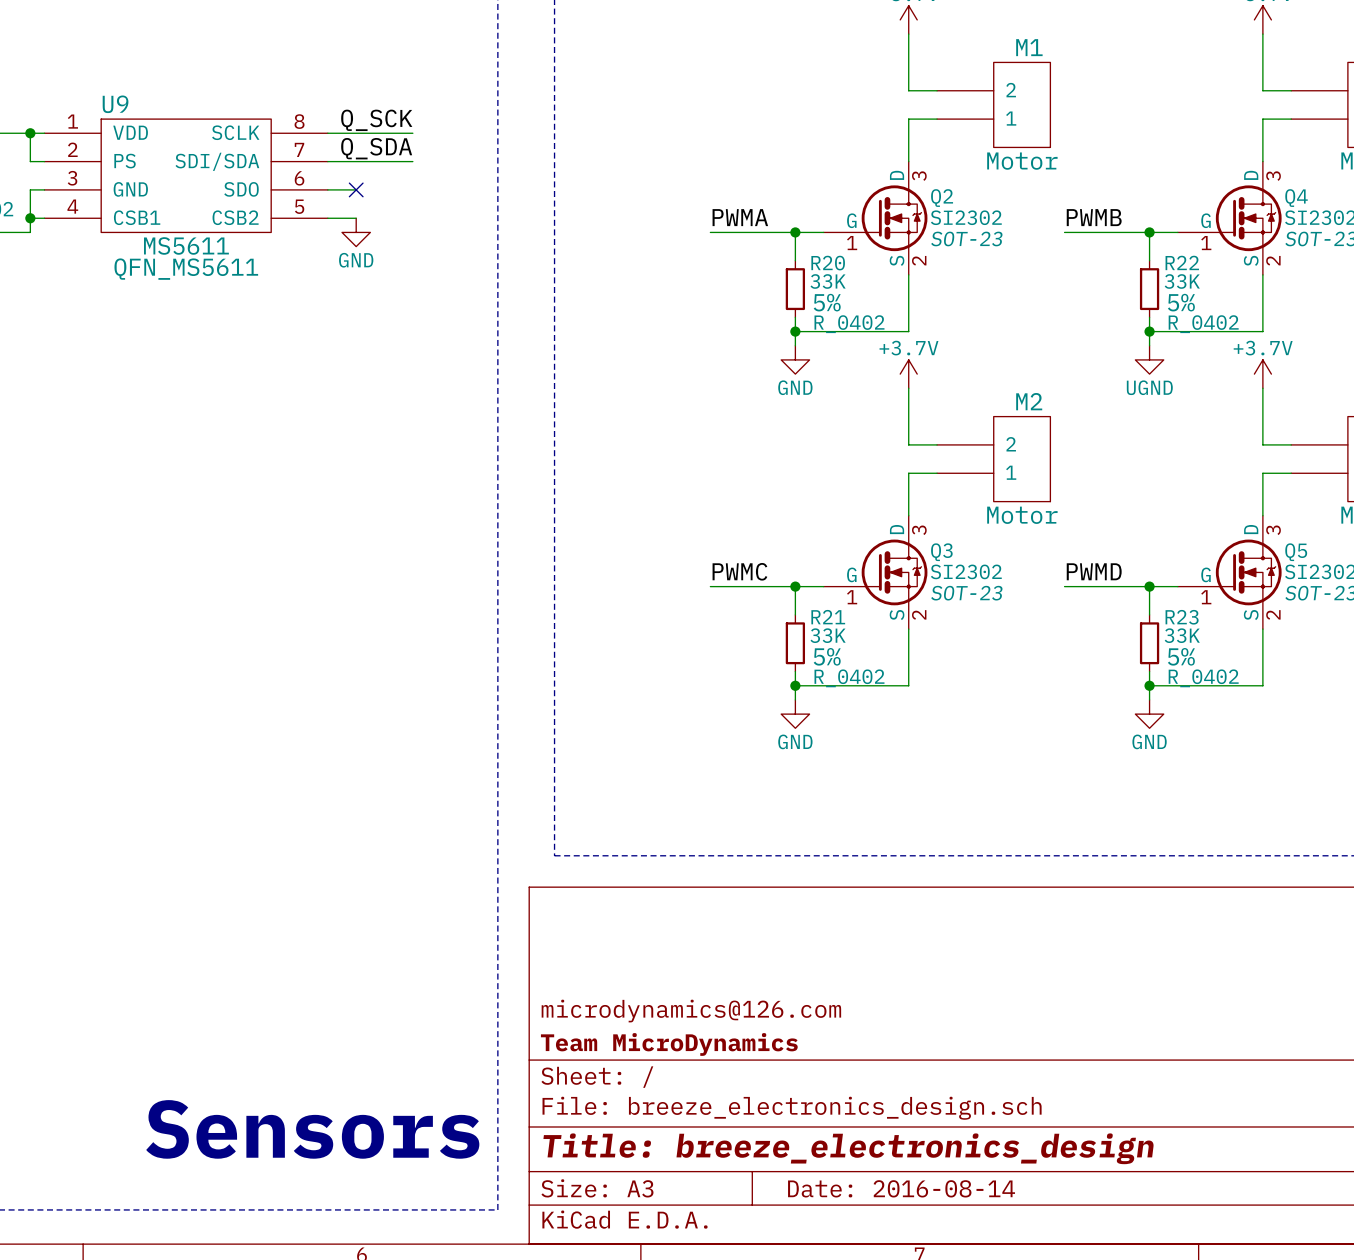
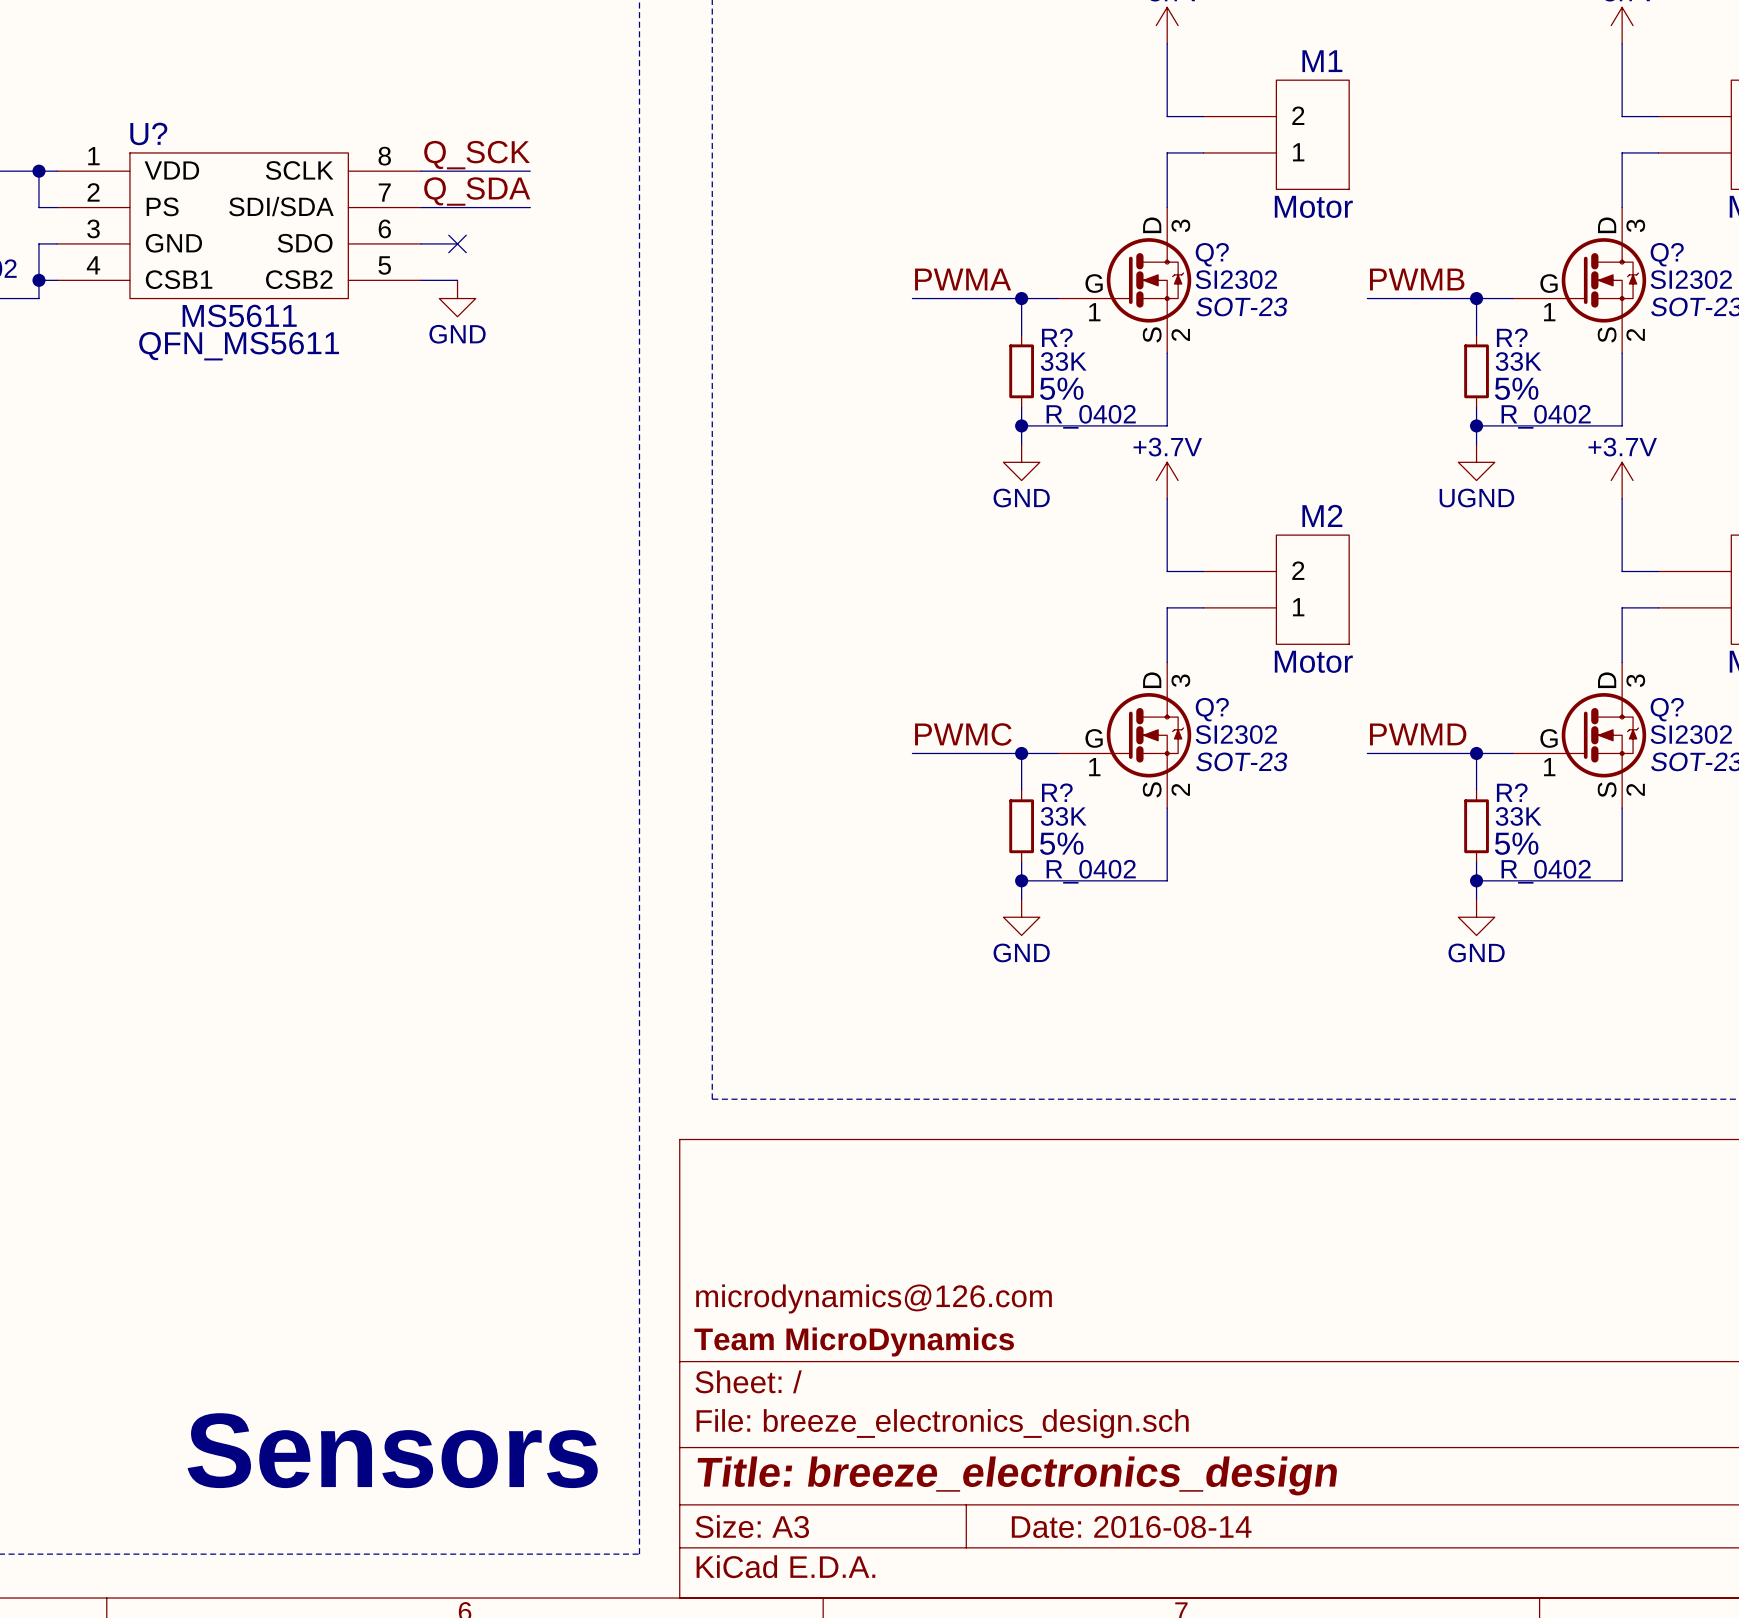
U9 name: U9 (115, 104) -> U? (148, 133)
Q2 name: Q2 (942, 198) -> Q? (1212, 254)
Q4 name: Q4 (1296, 198) -> Q? (1667, 254)
R22 name: R22 (1182, 262) -> R? (1512, 337)
R20 name: R20 (828, 263) -> R? (1057, 337)
Q3 name: Q3 (941, 552) -> Q? (1212, 709)
Q5 name: Q5 (1296, 552) -> Q? (1667, 709)
R21 name: R21 (828, 617) -> R? (1057, 792)
R23 name: R23 (1182, 617) -> R? (1512, 792)

